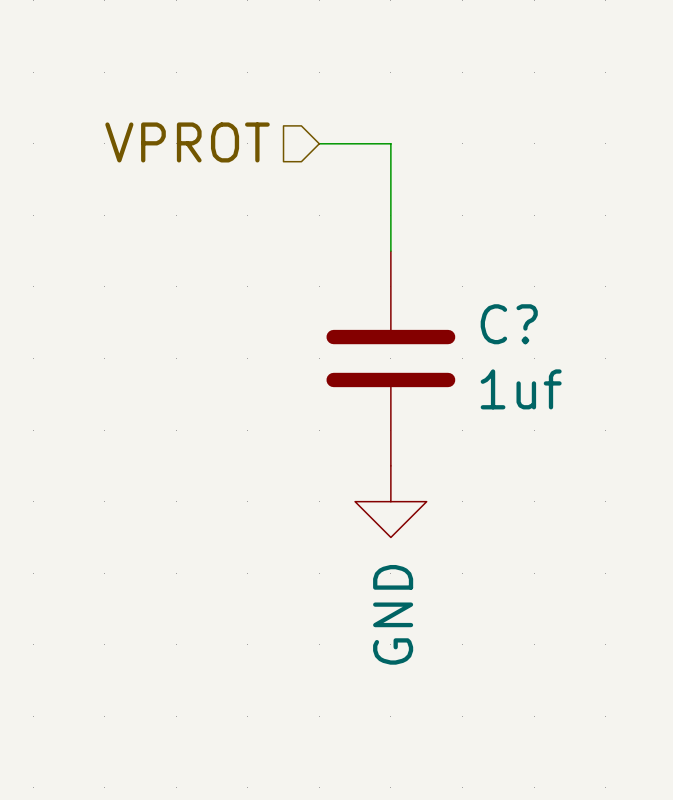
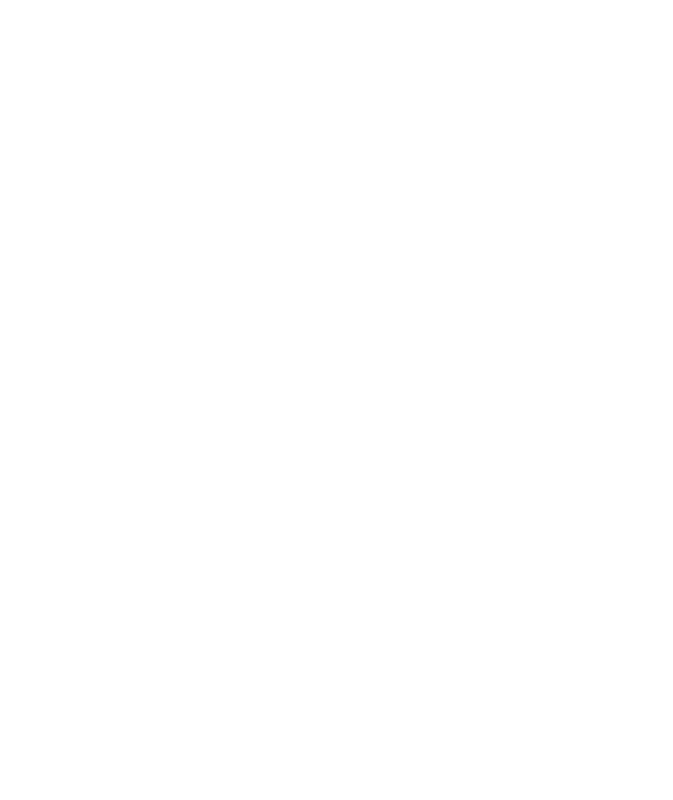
hierarchical label: VPROT (187, 142) -> none
wire: (319, 143) (390, 143) (390, 251) -> none
C?: 1uf (390, 358) -> none
power symbol: GND (390, 501) -> none

